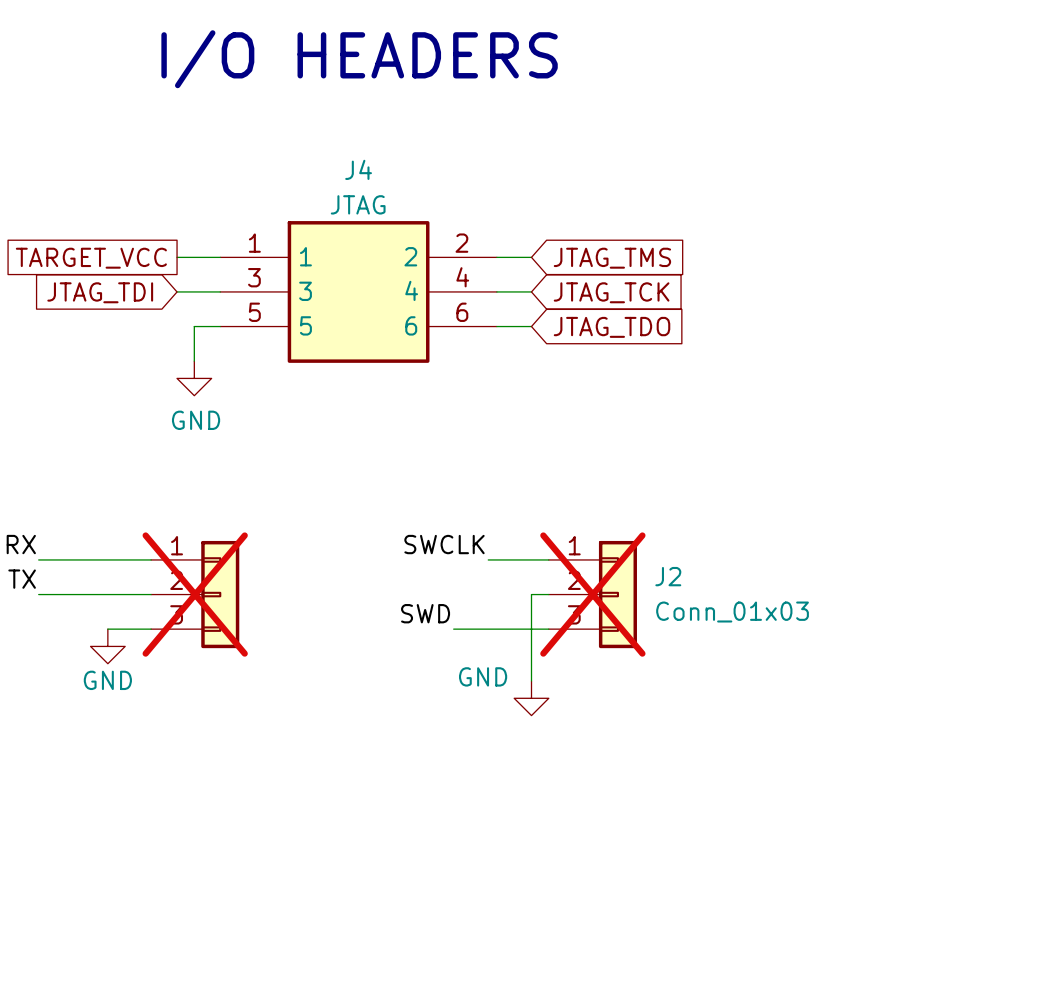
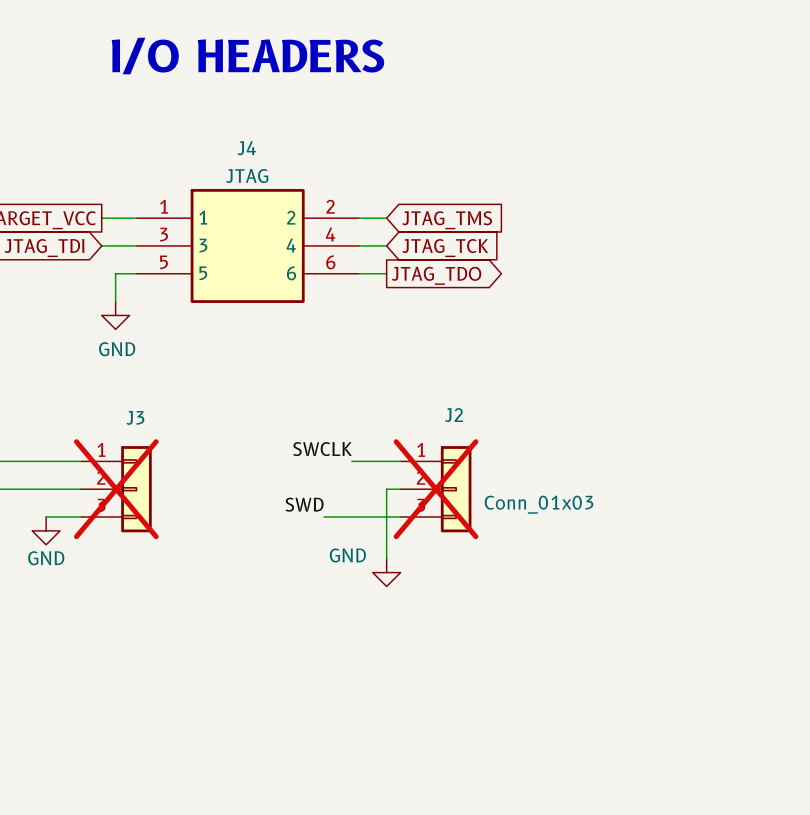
global label shape: input (612, 327) -> output (436, 275)
J3 name: none -> J3 (135, 417)
J2 name position: J2 (668, 576) -> J2 (453, 415)

